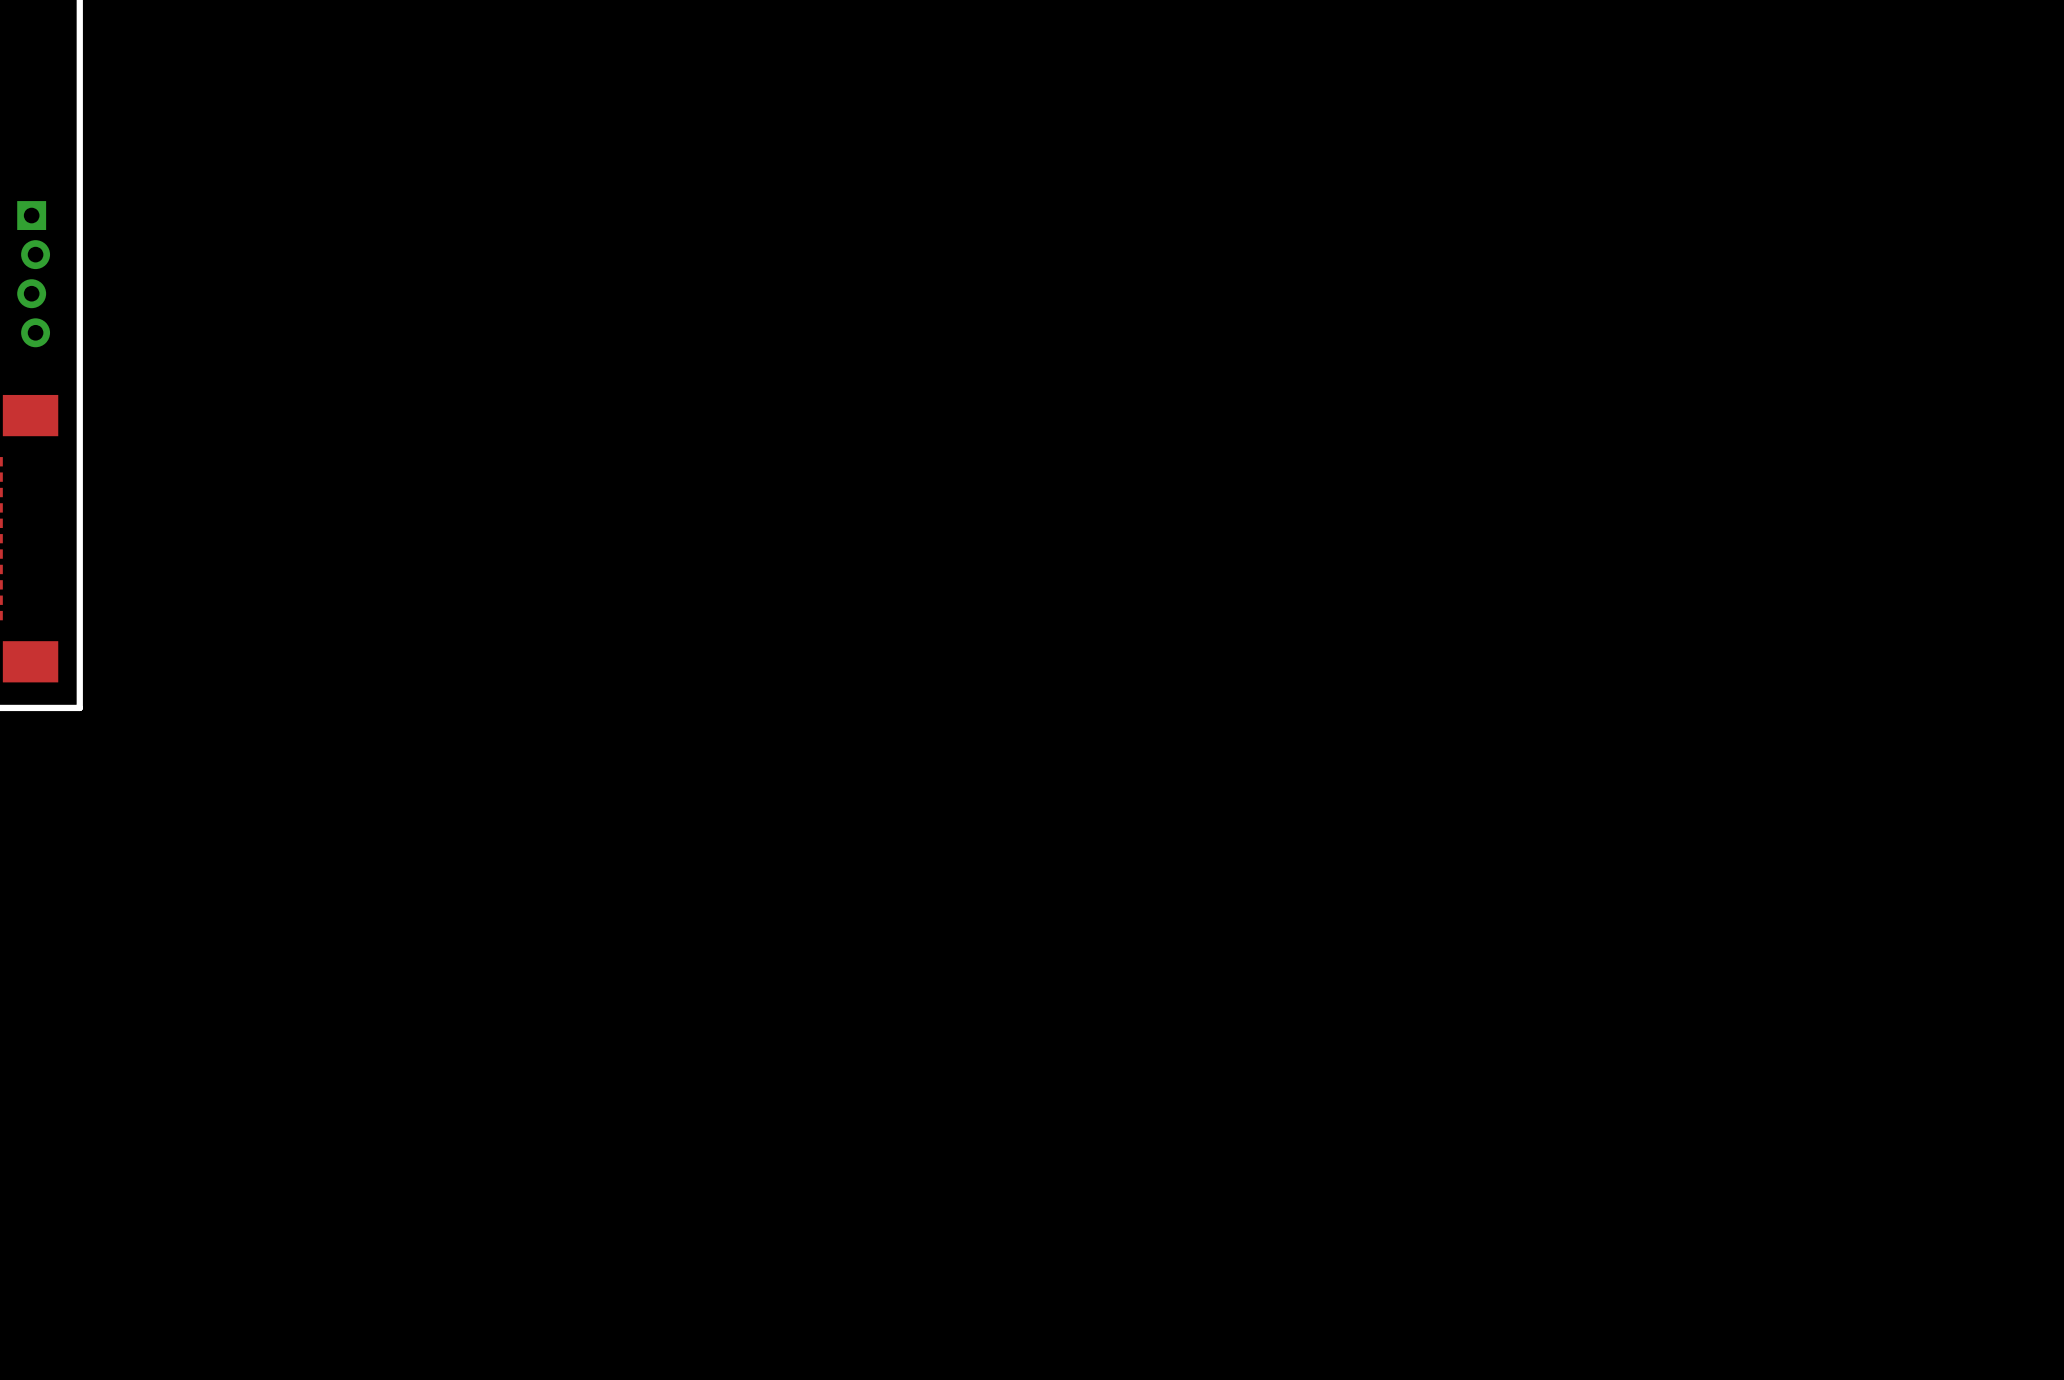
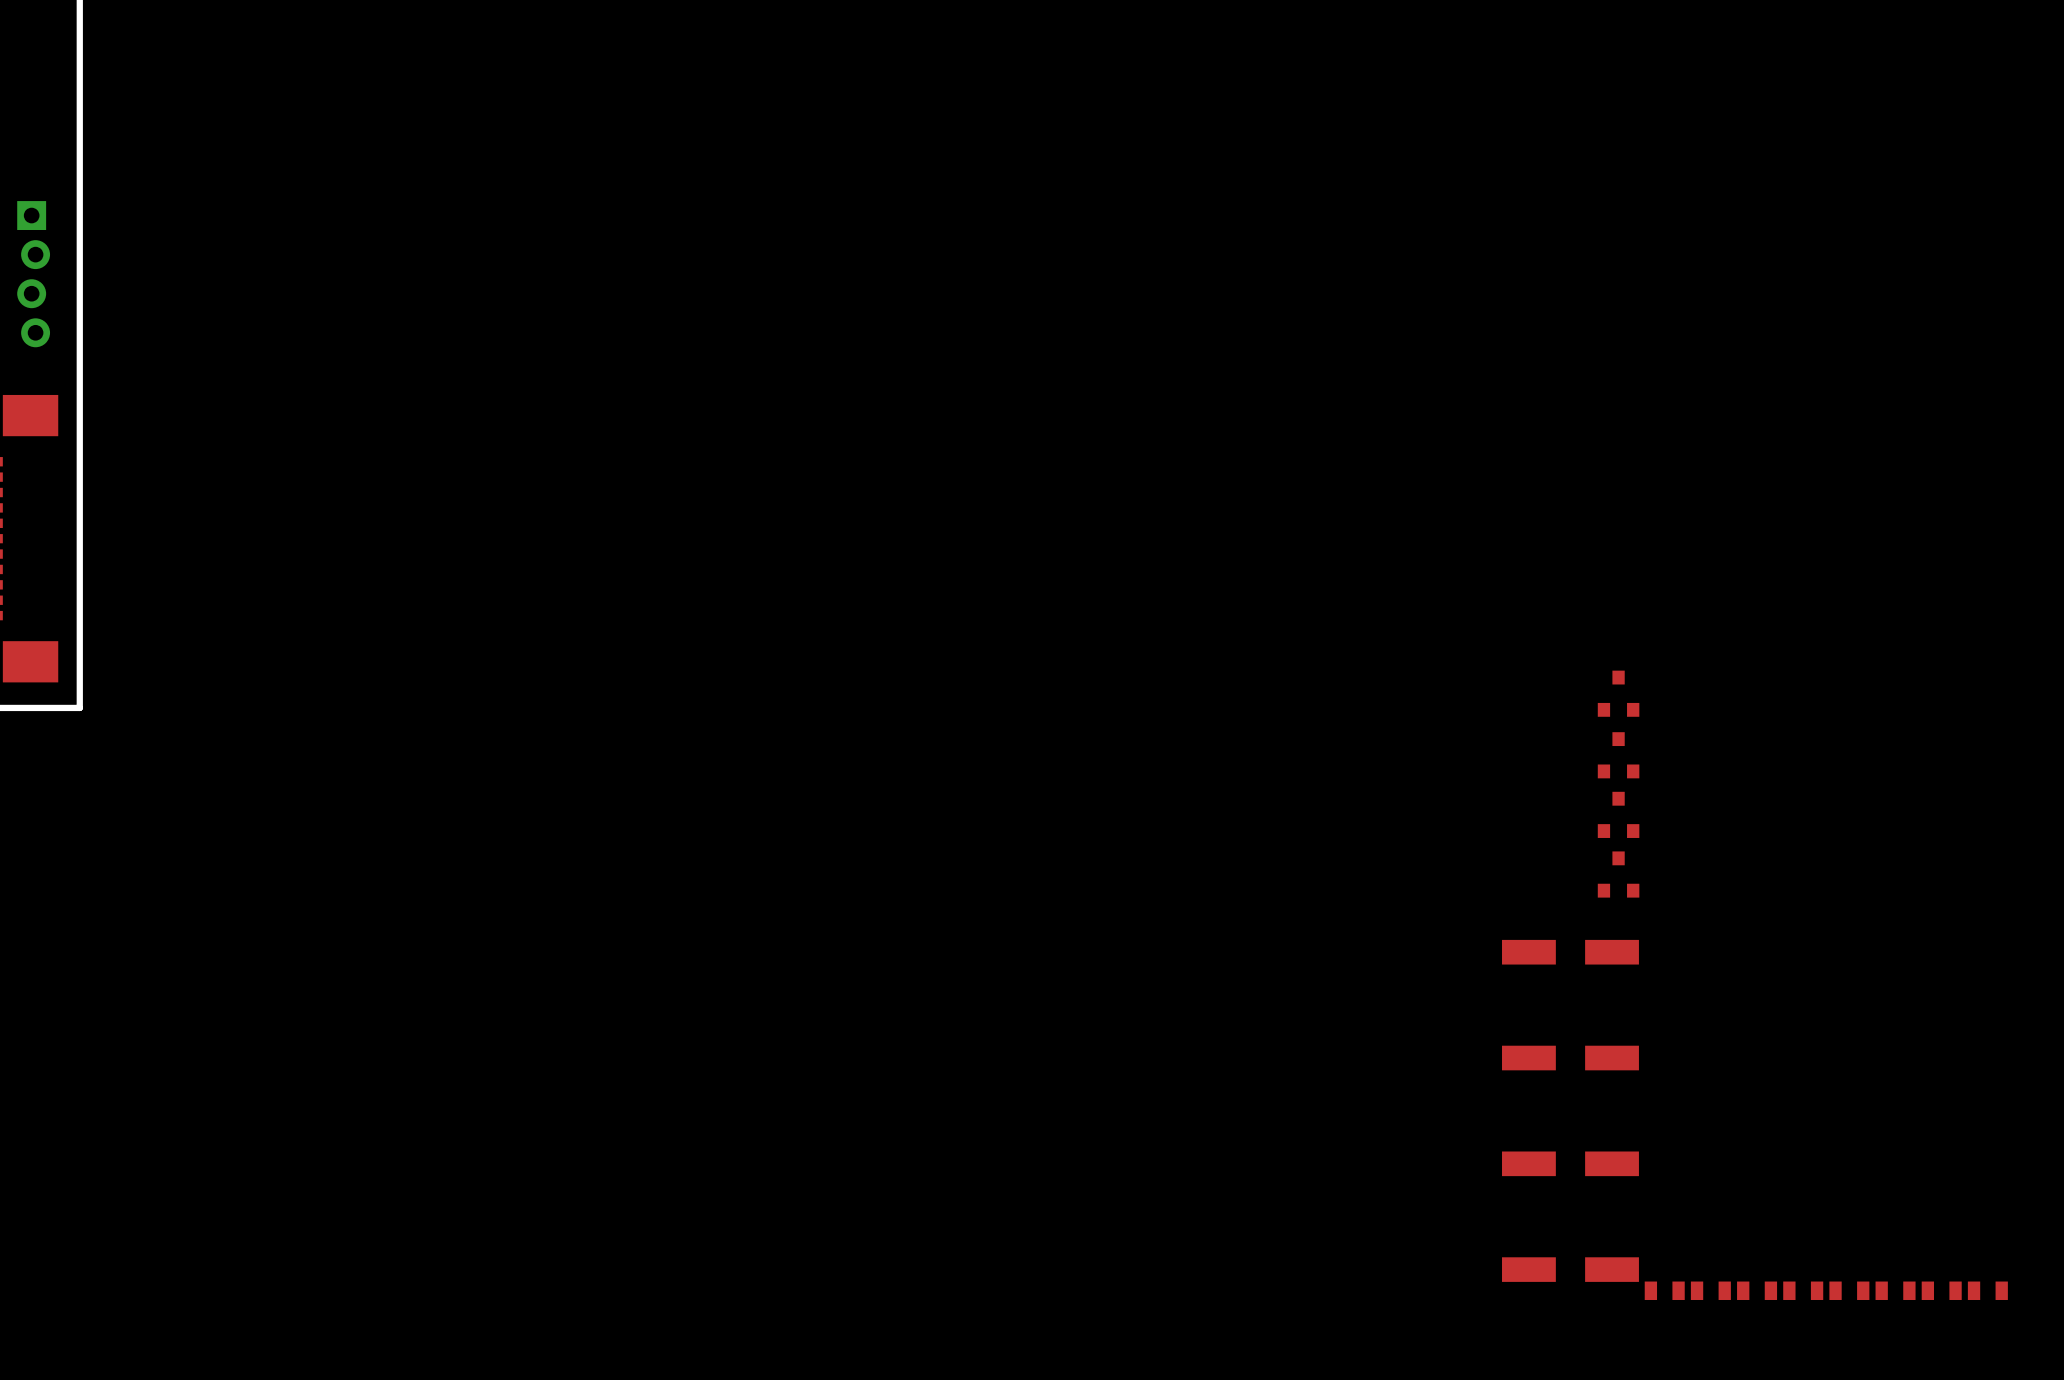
part: none -> (1618, 693)
part: none -> (1618, 755)
part: none -> (1618, 814)
part: none -> (1618, 874)
part: none -> (1570, 952)
part: none -> (1570, 1058)
part: none -> (1570, 1163)
part: none -> (1570, 1269)
part: none -> (1664, 1290)
part: none -> (1710, 1290)
part: none -> (1757, 1290)
part: none -> (1803, 1290)
part: none -> (1849, 1290)
part: none -> (1895, 1290)
part: none -> (1941, 1290)
part: none -> (1987, 1290)

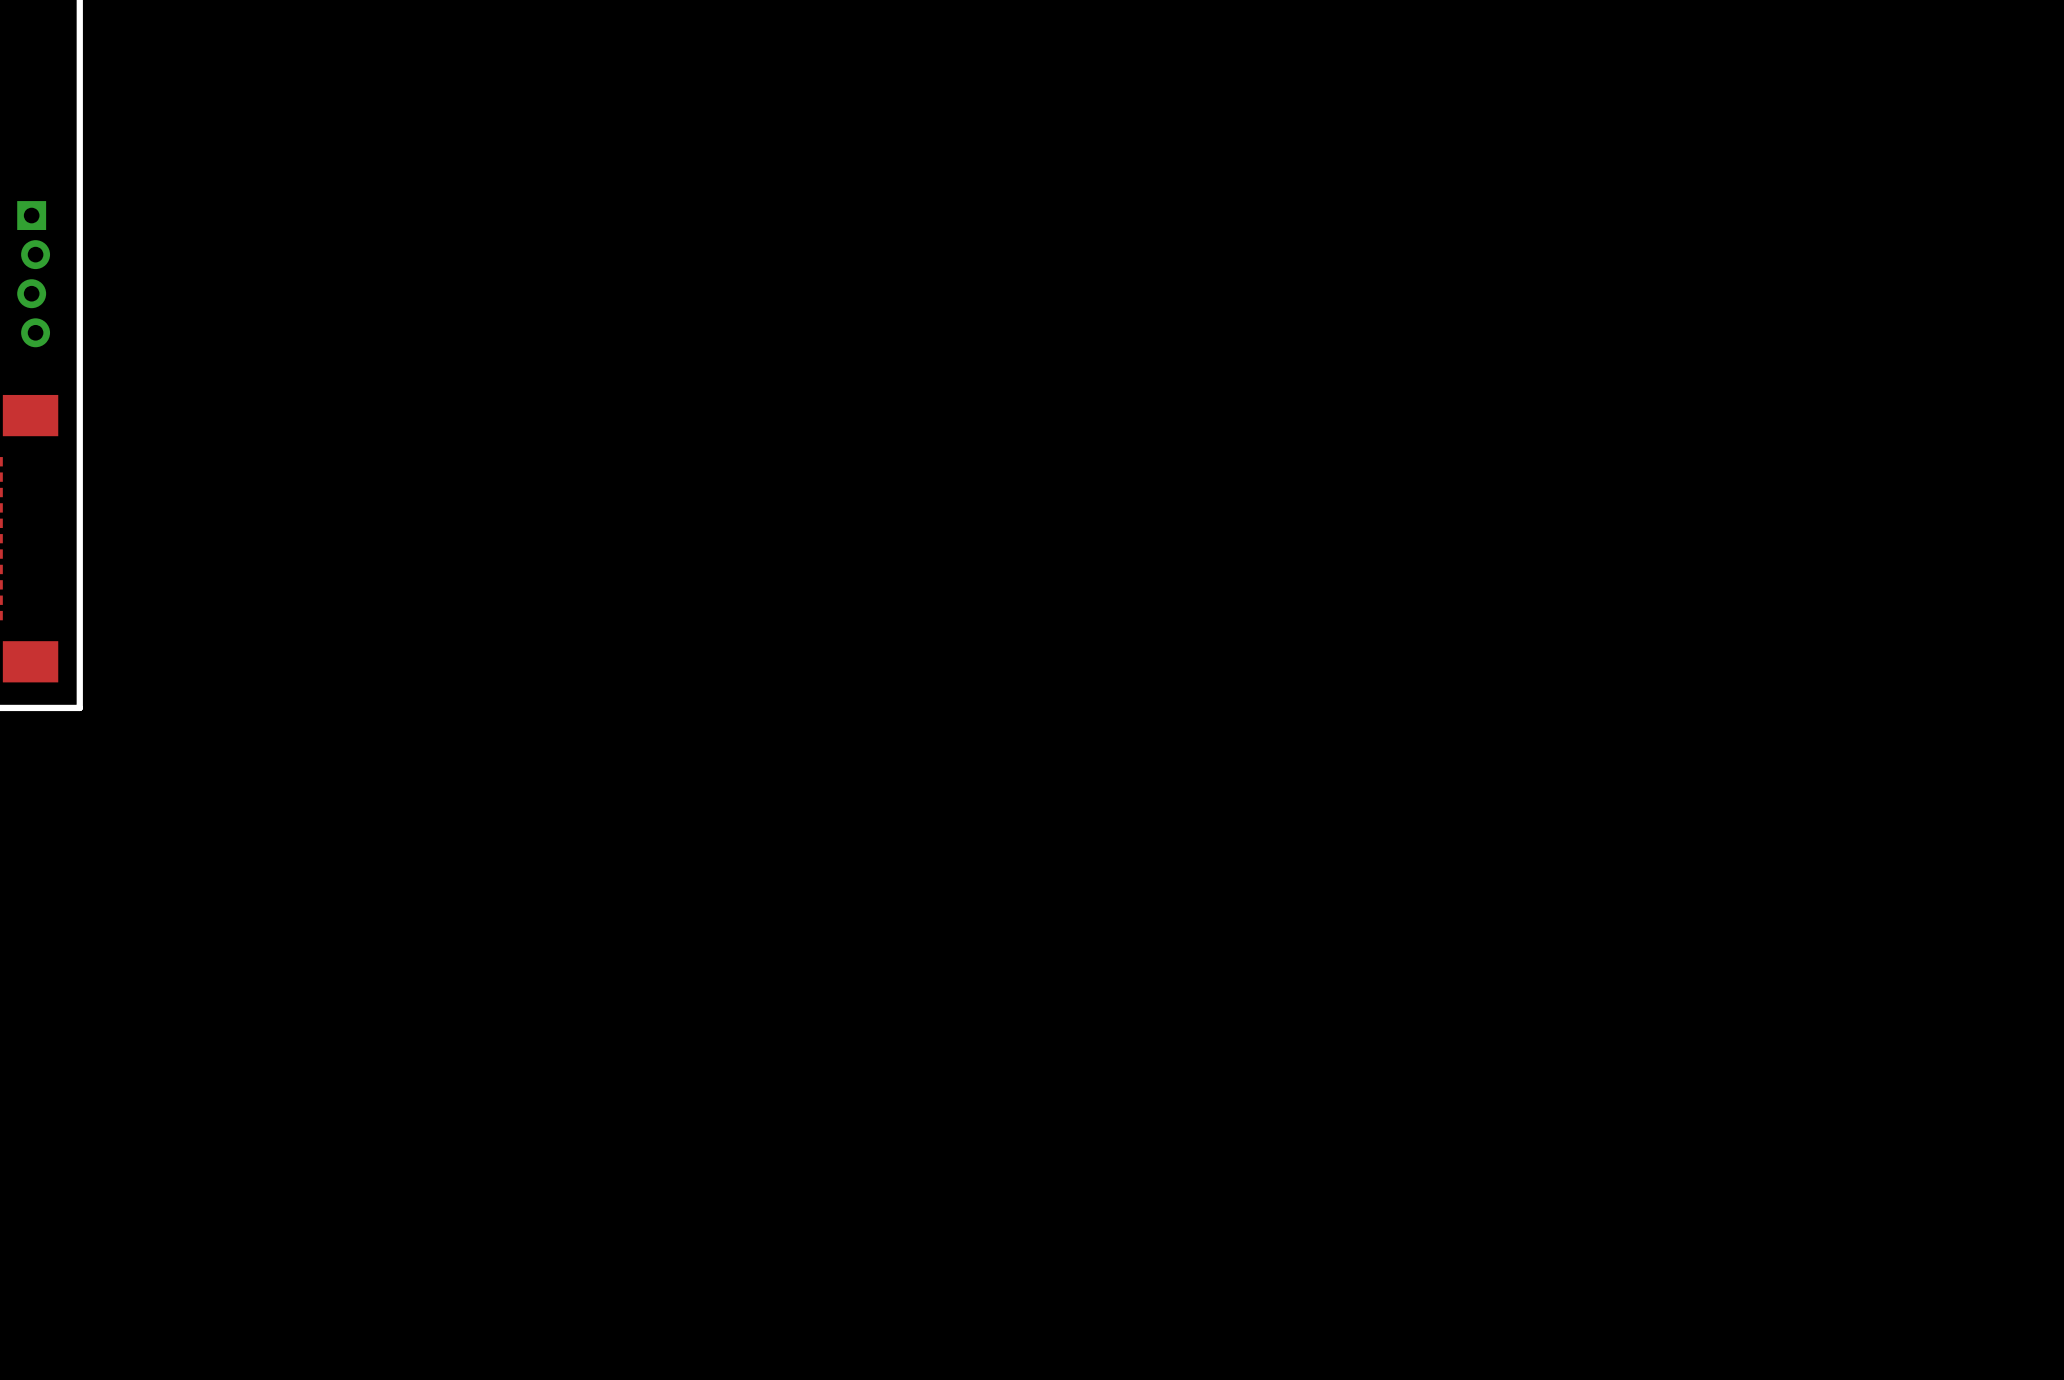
part: (1618, 693) -> none
part: (1618, 755) -> none
part: (1618, 814) -> none
part: (1618, 874) -> none
part: (1570, 952) -> none
part: (1570, 1058) -> none
part: (1570, 1163) -> none
part: (1570, 1269) -> none
part: (1664, 1290) -> none
part: (1710, 1290) -> none
part: (1757, 1290) -> none
part: (1803, 1290) -> none
part: (1849, 1290) -> none
part: (1895, 1290) -> none
part: (1941, 1290) -> none
part: (1987, 1290) -> none

